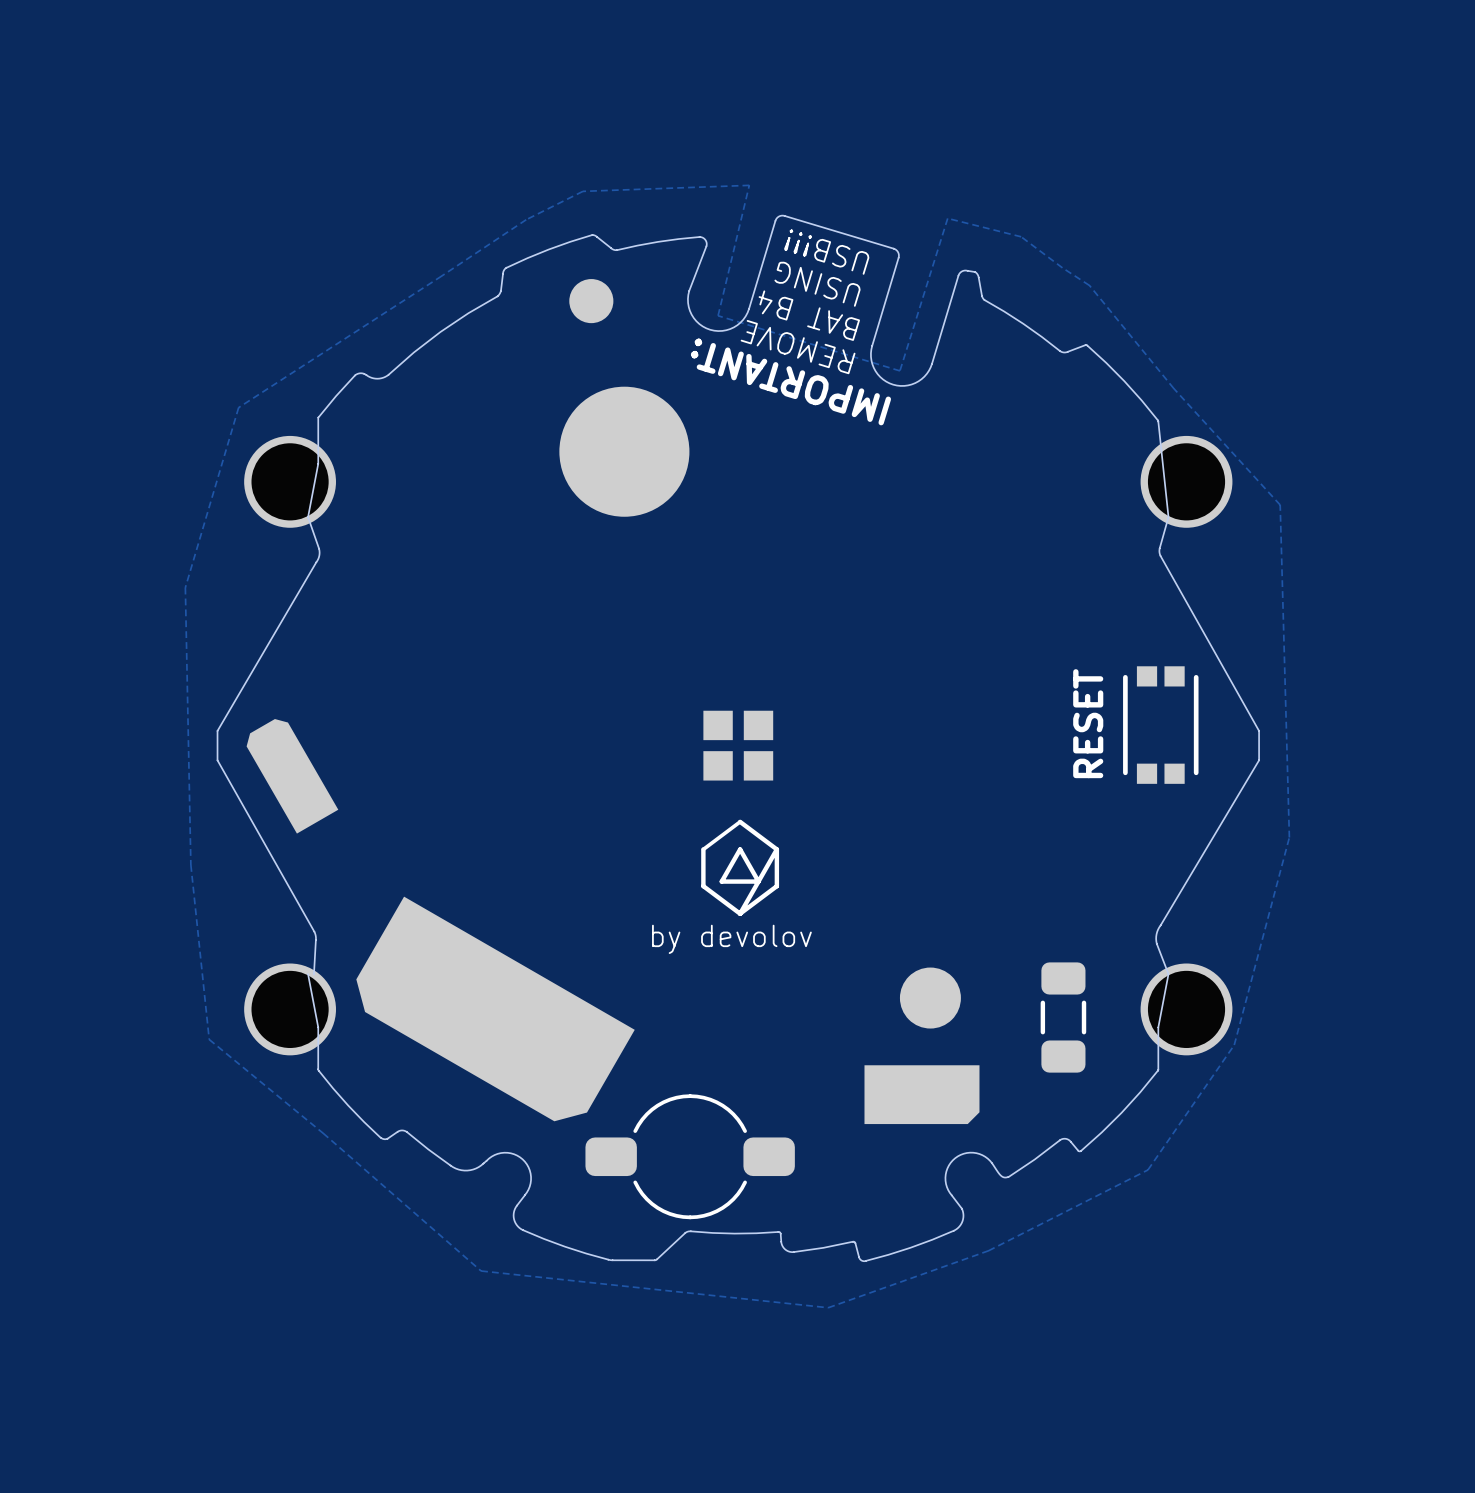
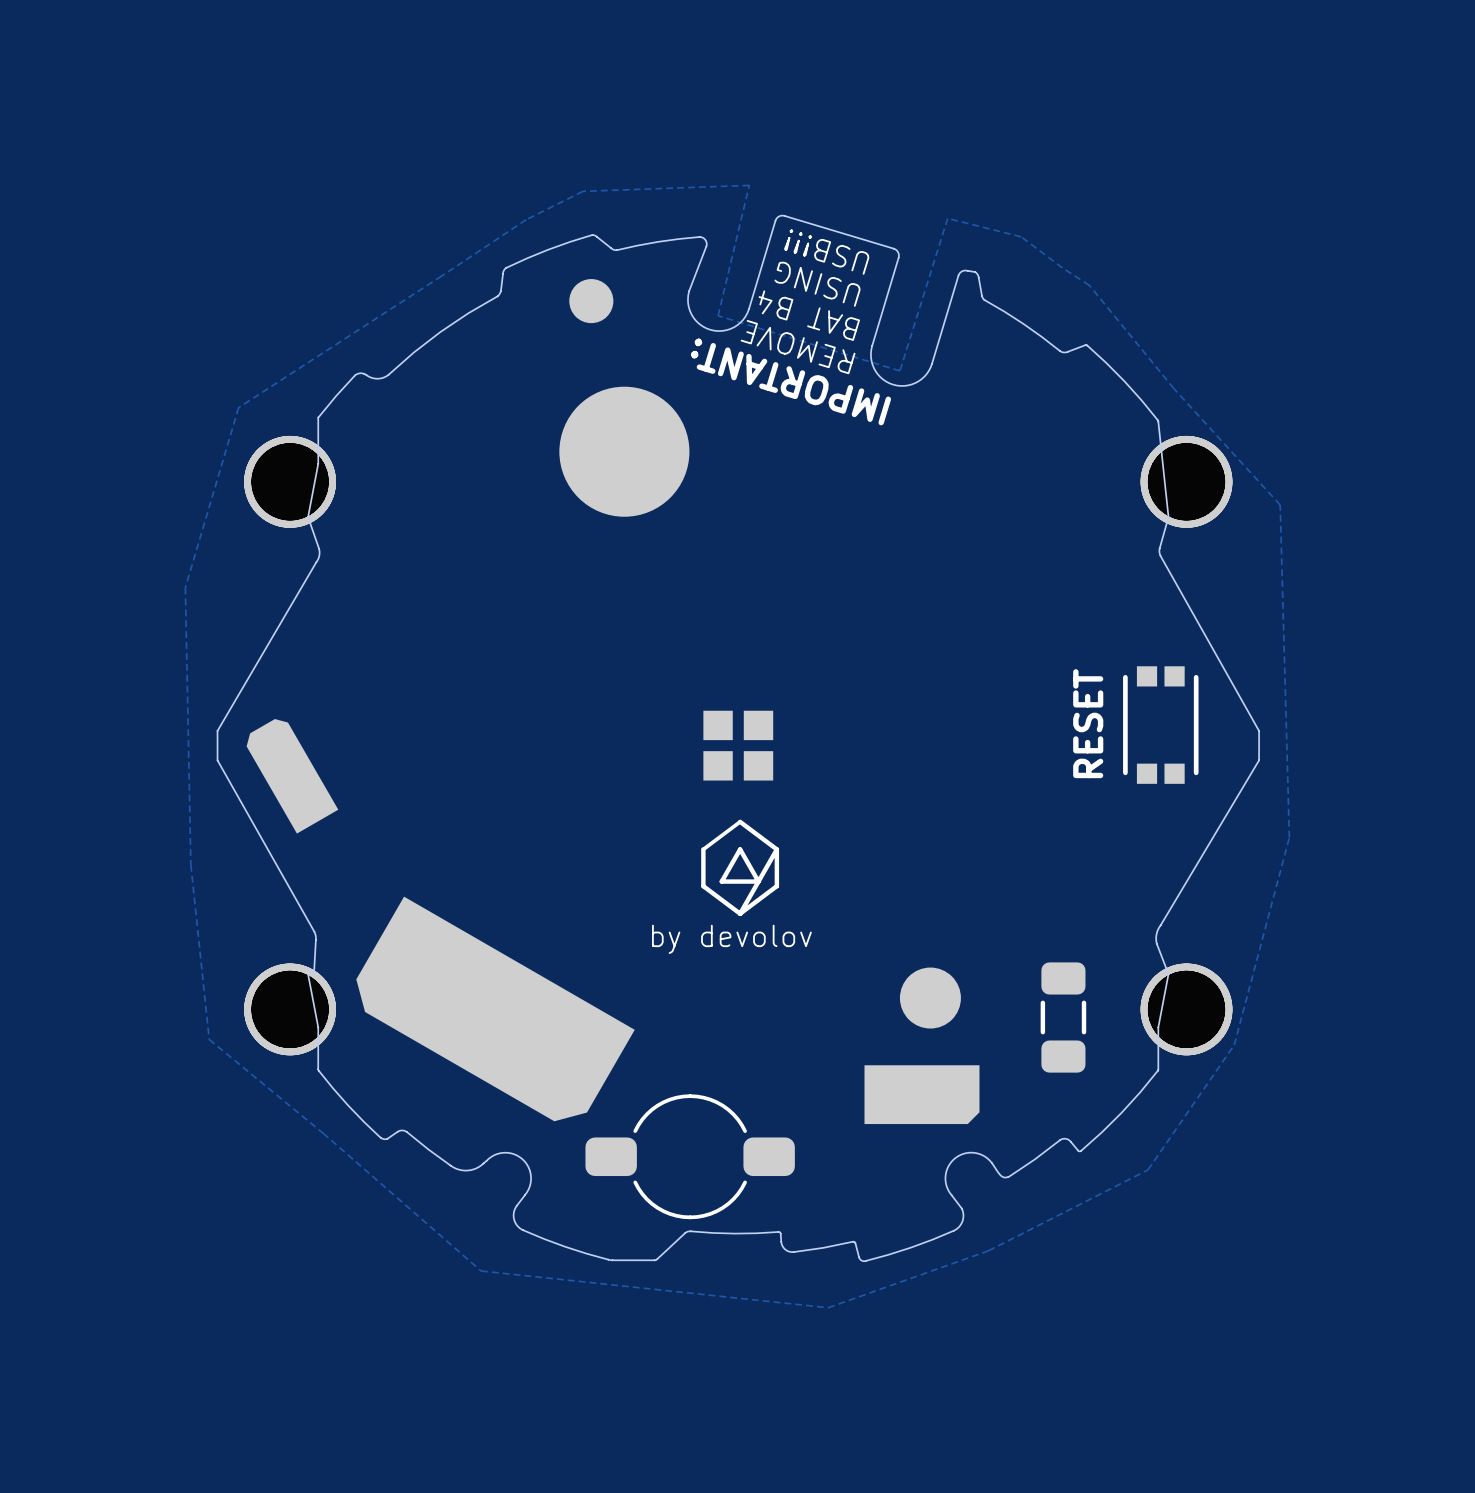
part: none -> (290, 481)
part: none -> (1186, 481)
part: none -> (290, 1009)
part: none -> (1186, 1009)

